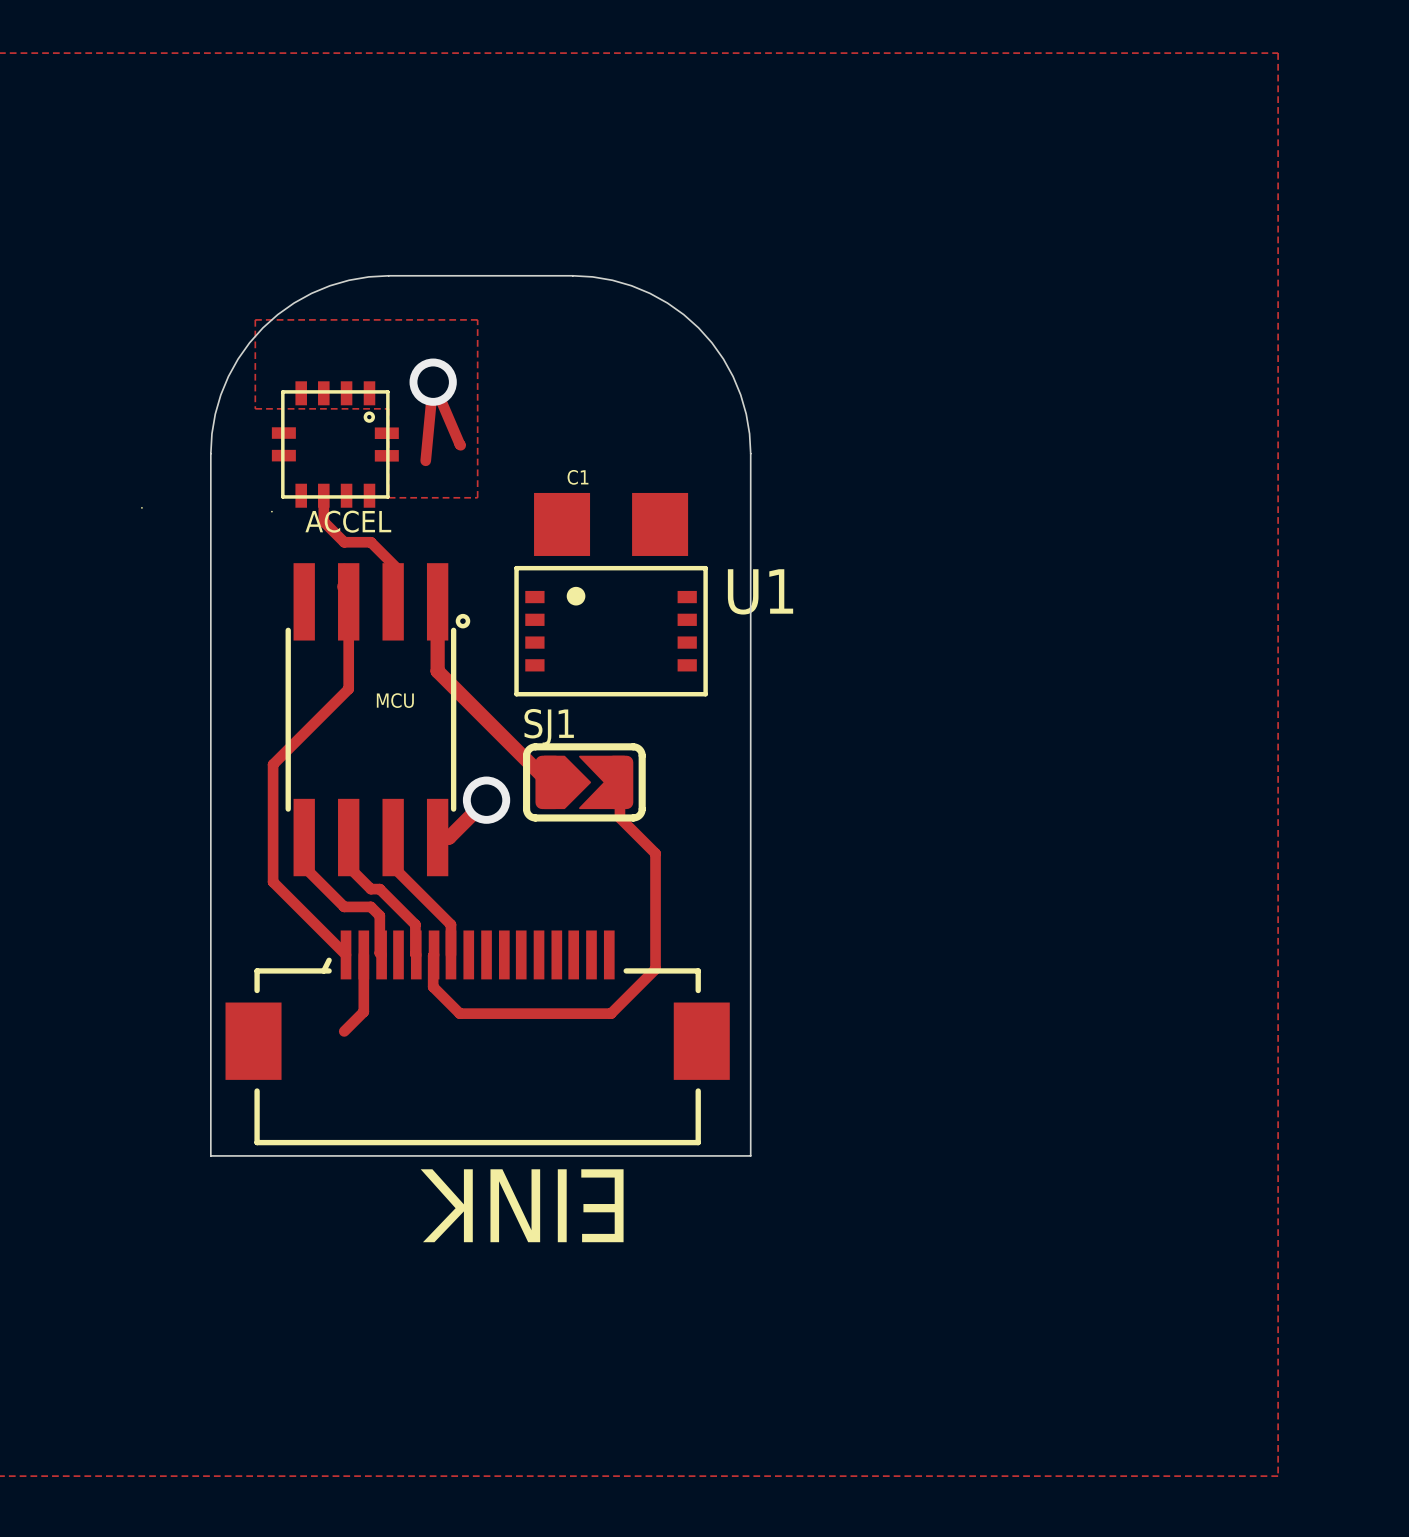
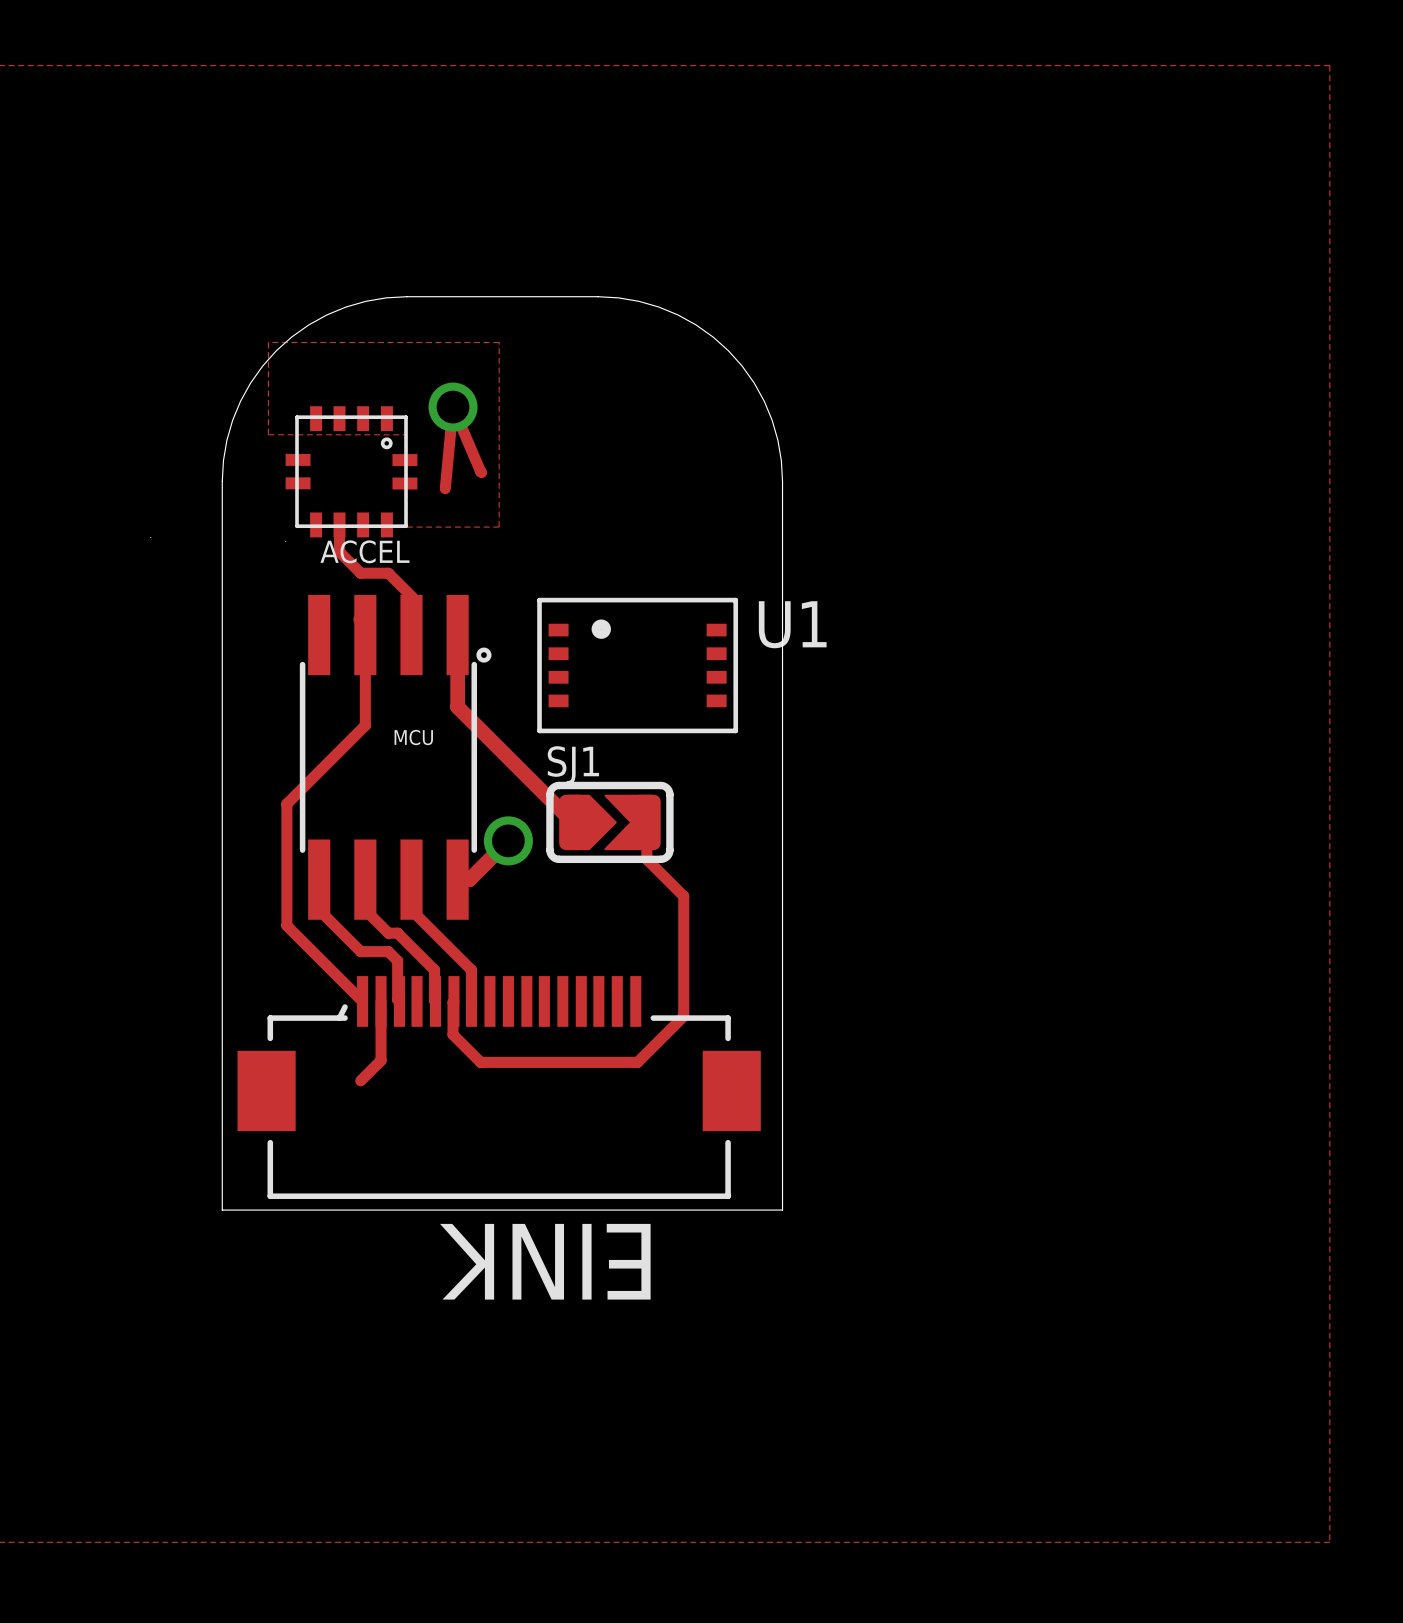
C1: (611, 524) -> none

